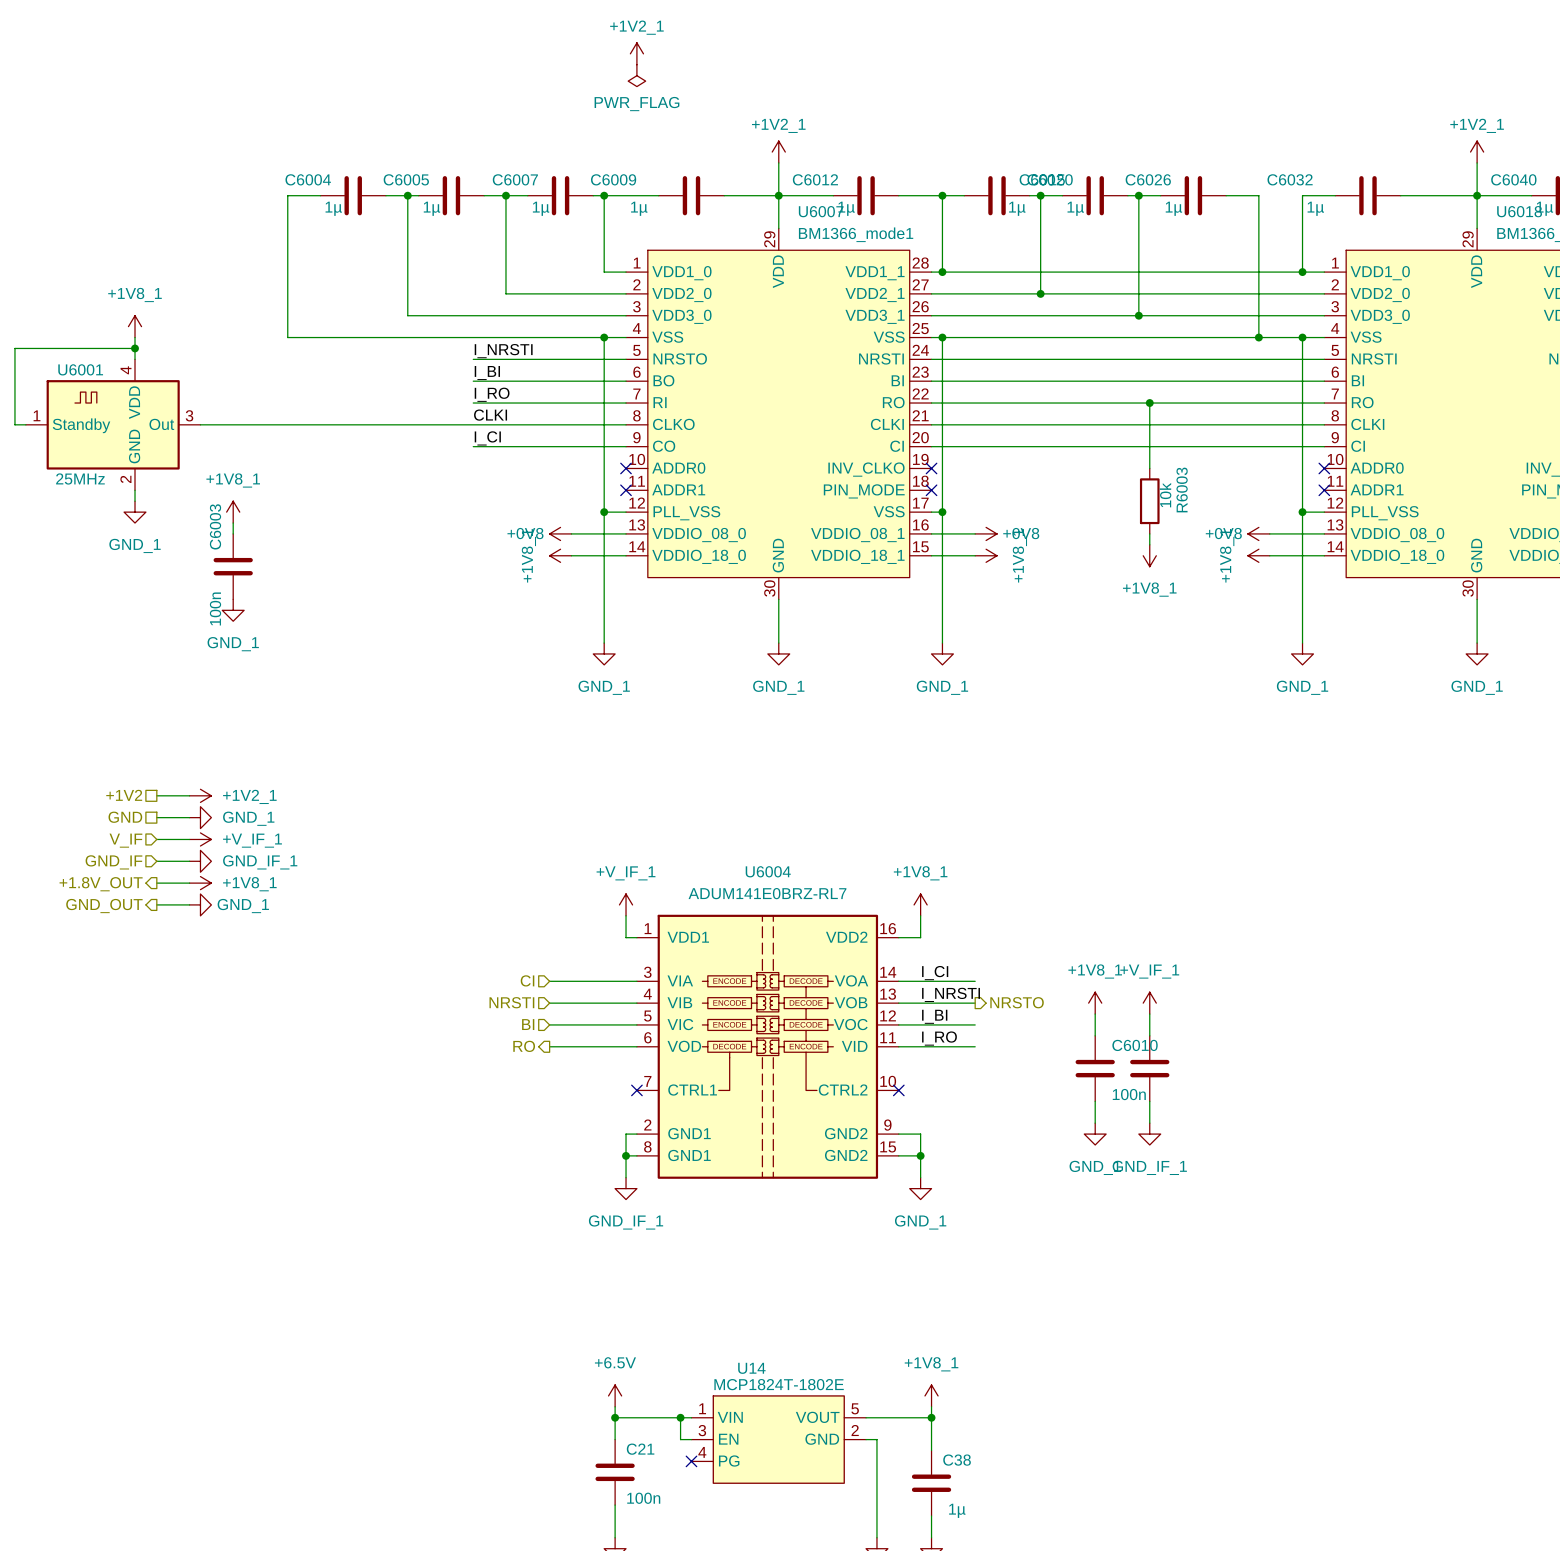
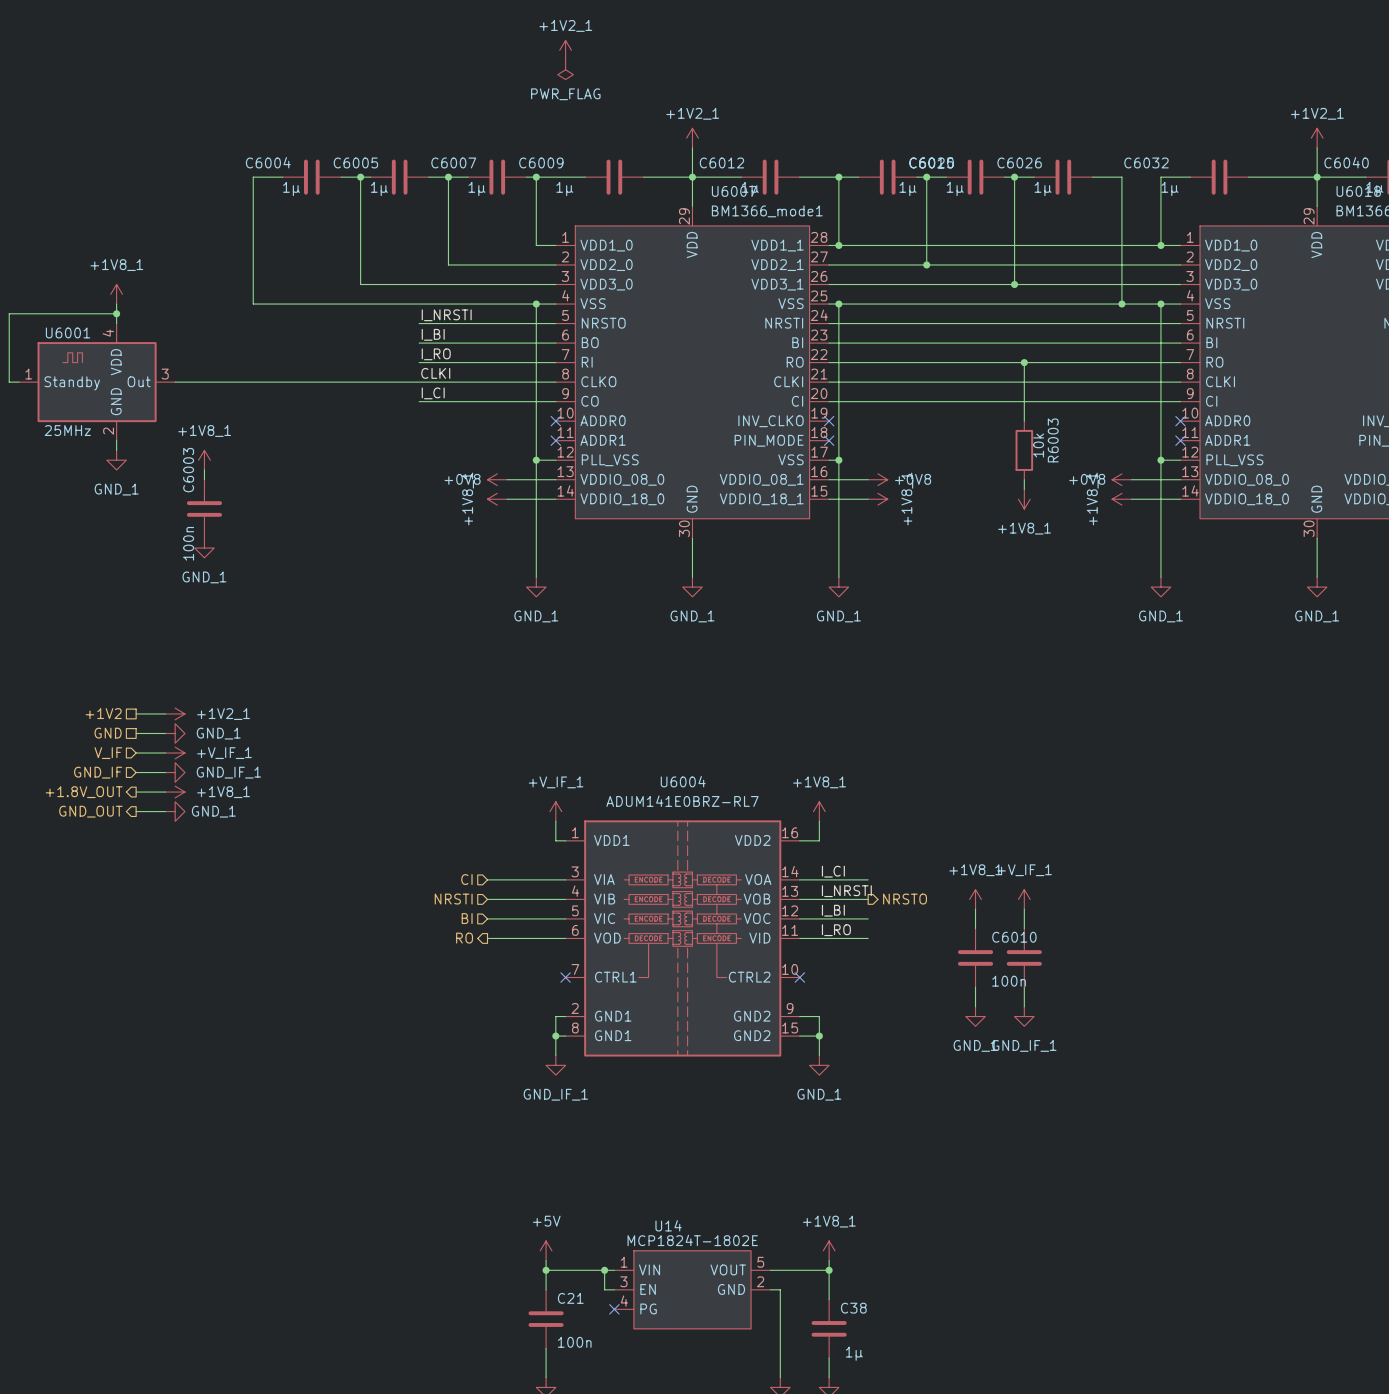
power symbol: +6.5V (615, 1395) -> +5V (546, 1250)

